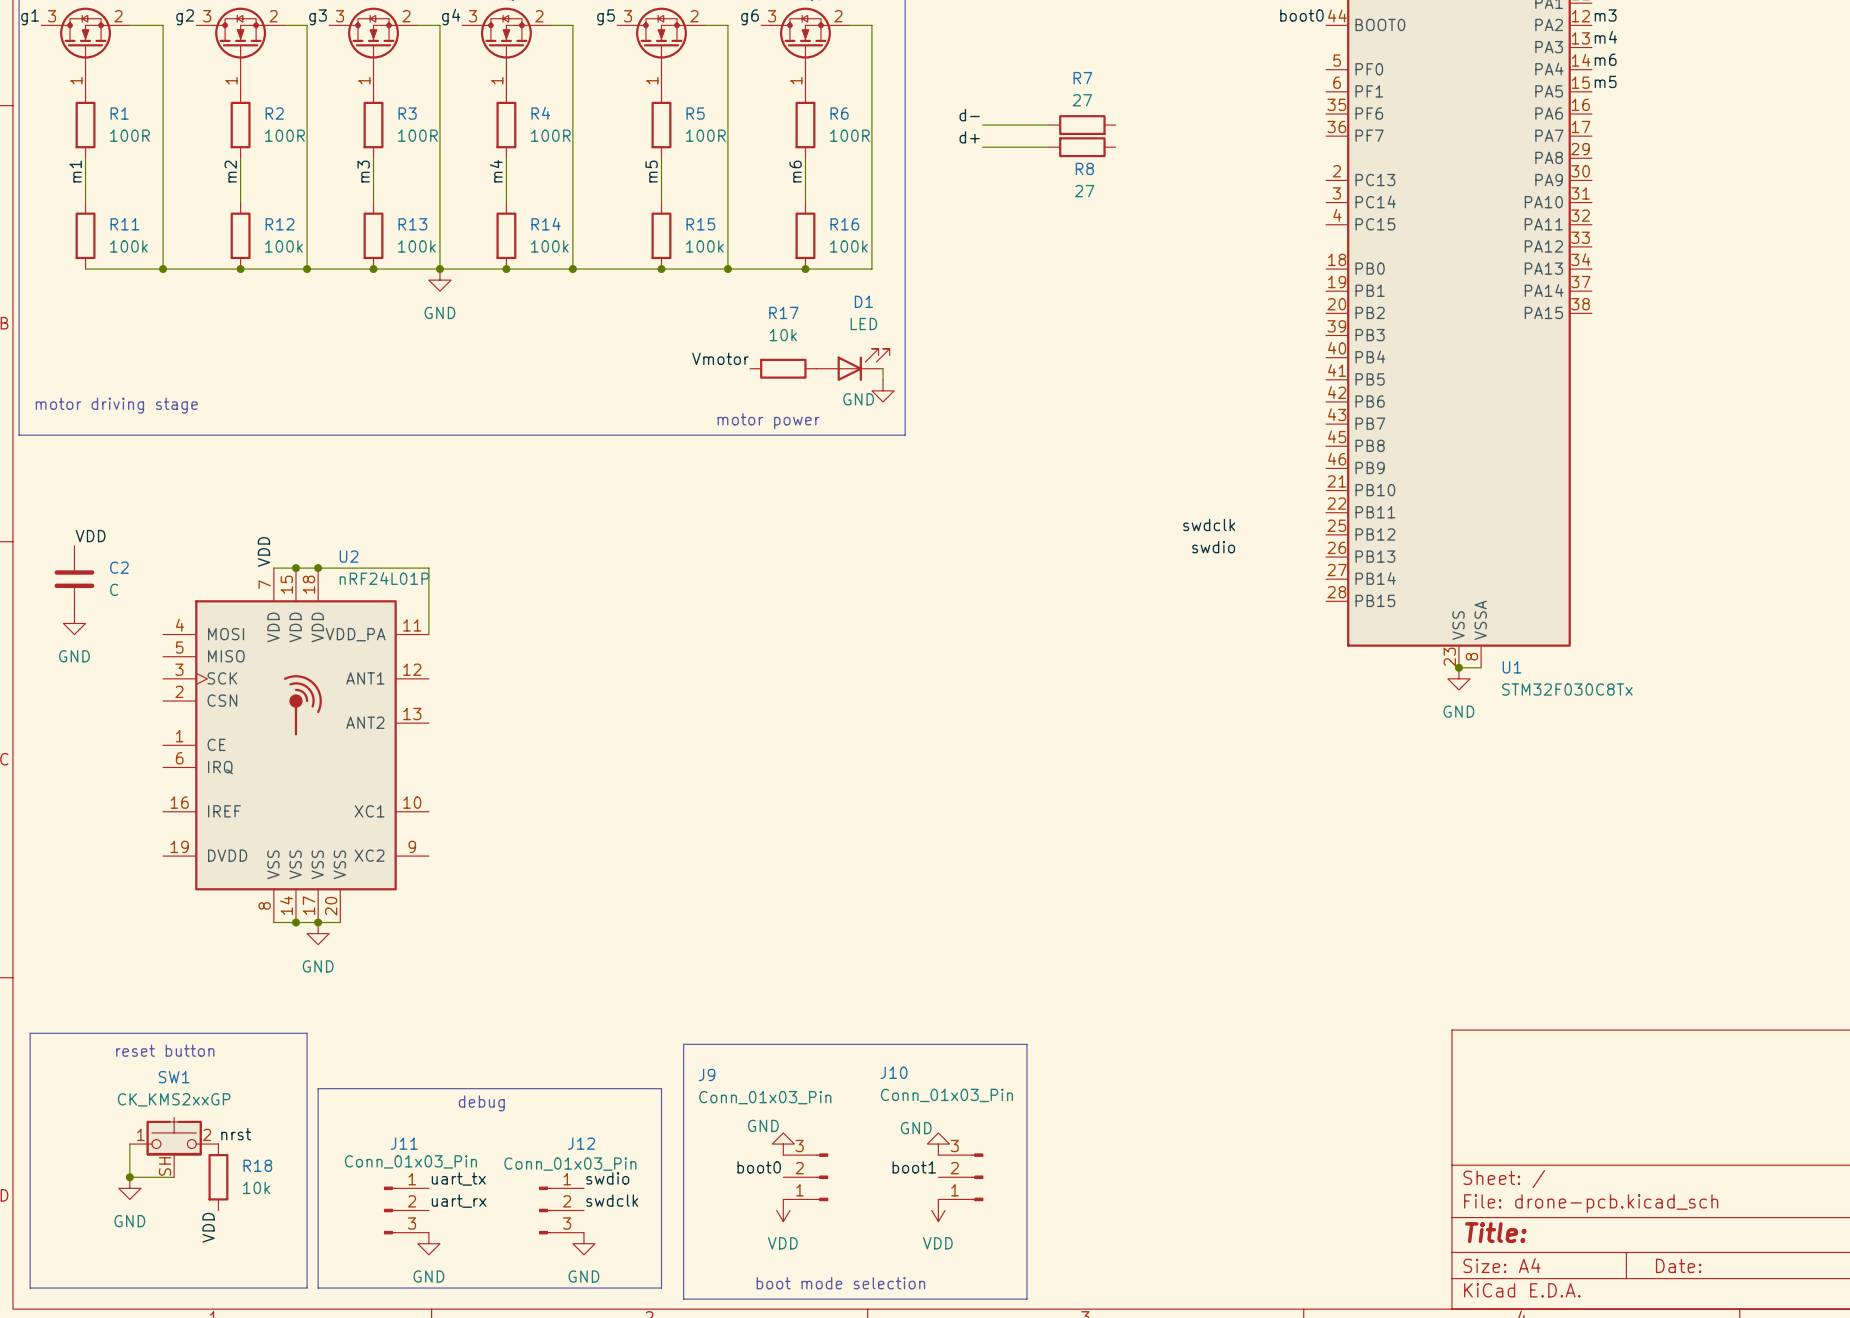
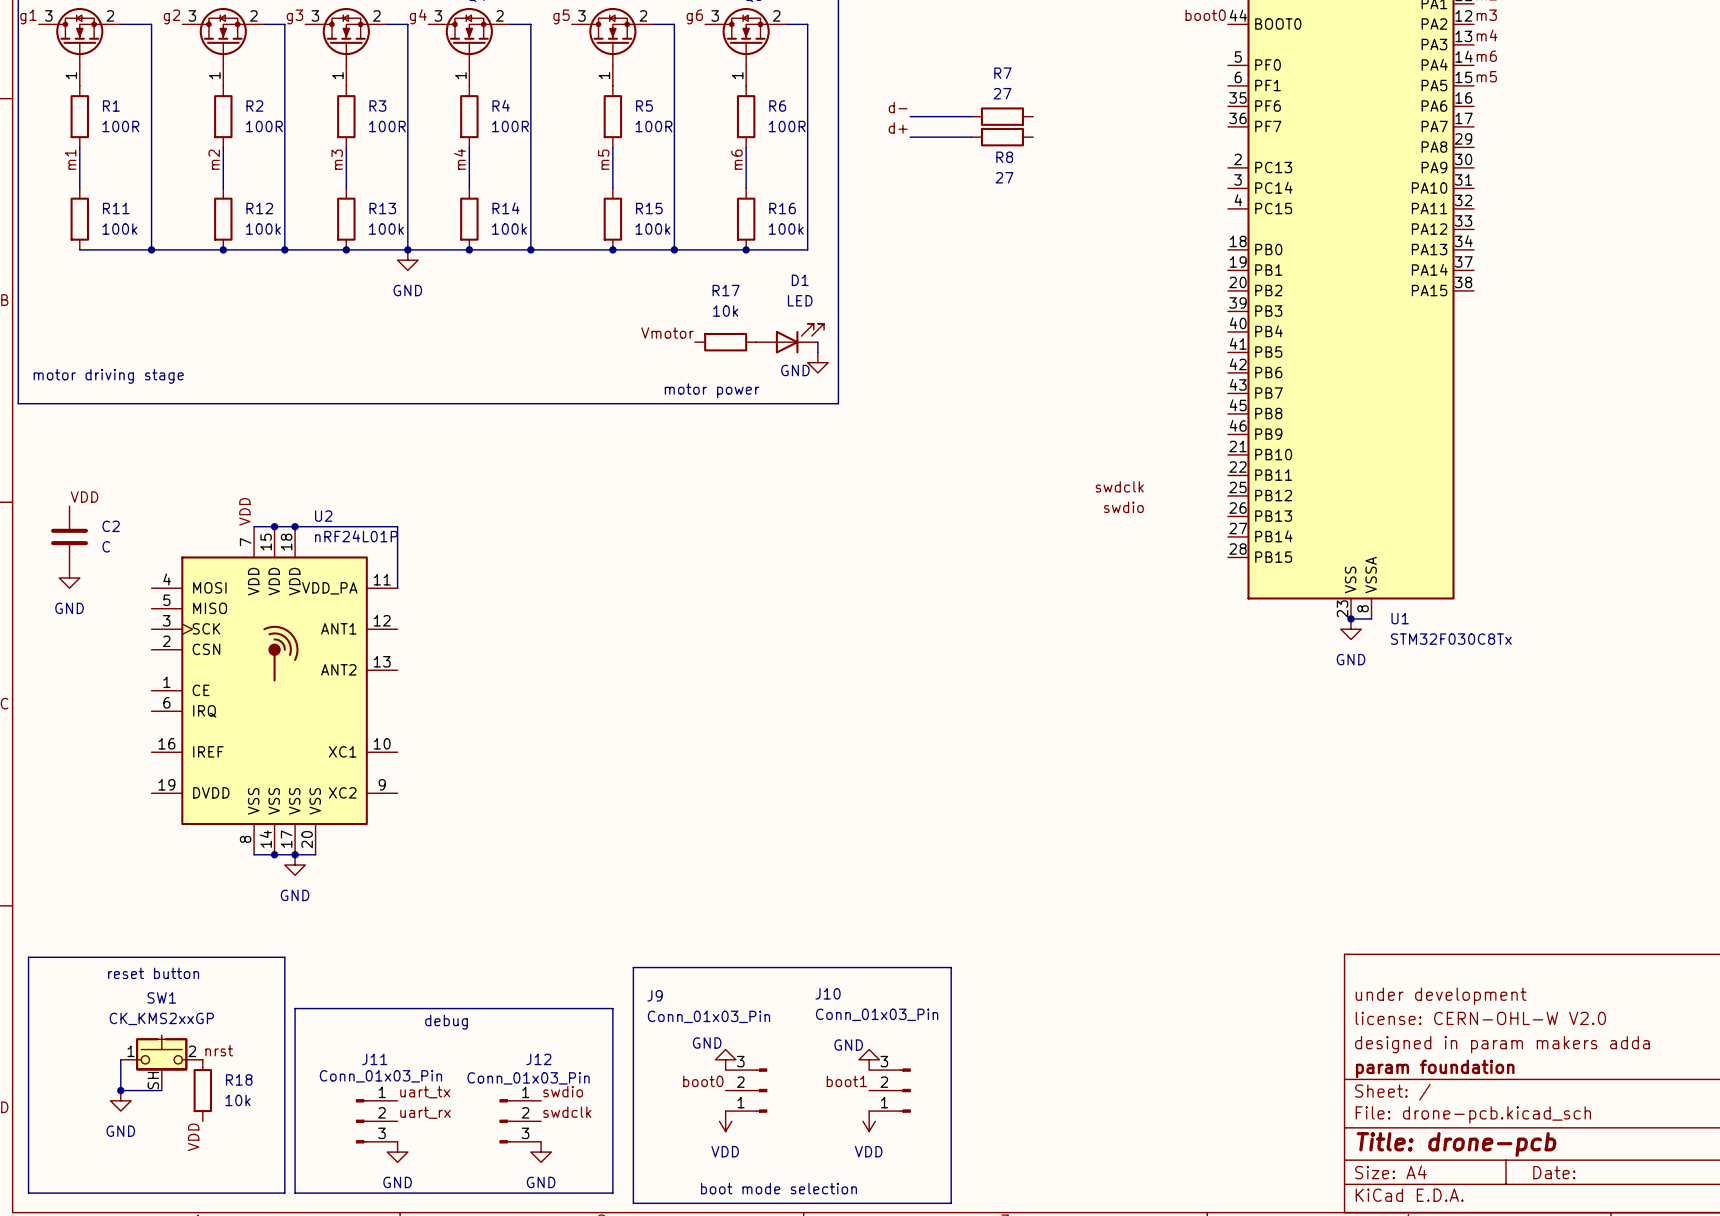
title block: none -> under development (1441, 996)
title block: none -> license: CERN-OHL-W V2.0 (1480, 1018)
title block: none -> designed in param makers adda (1502, 1044)
title block: none -> param foundation (1435, 1068)
title block: Title: (1495, 1232) -> Title: drone-pcb (1456, 1144)

